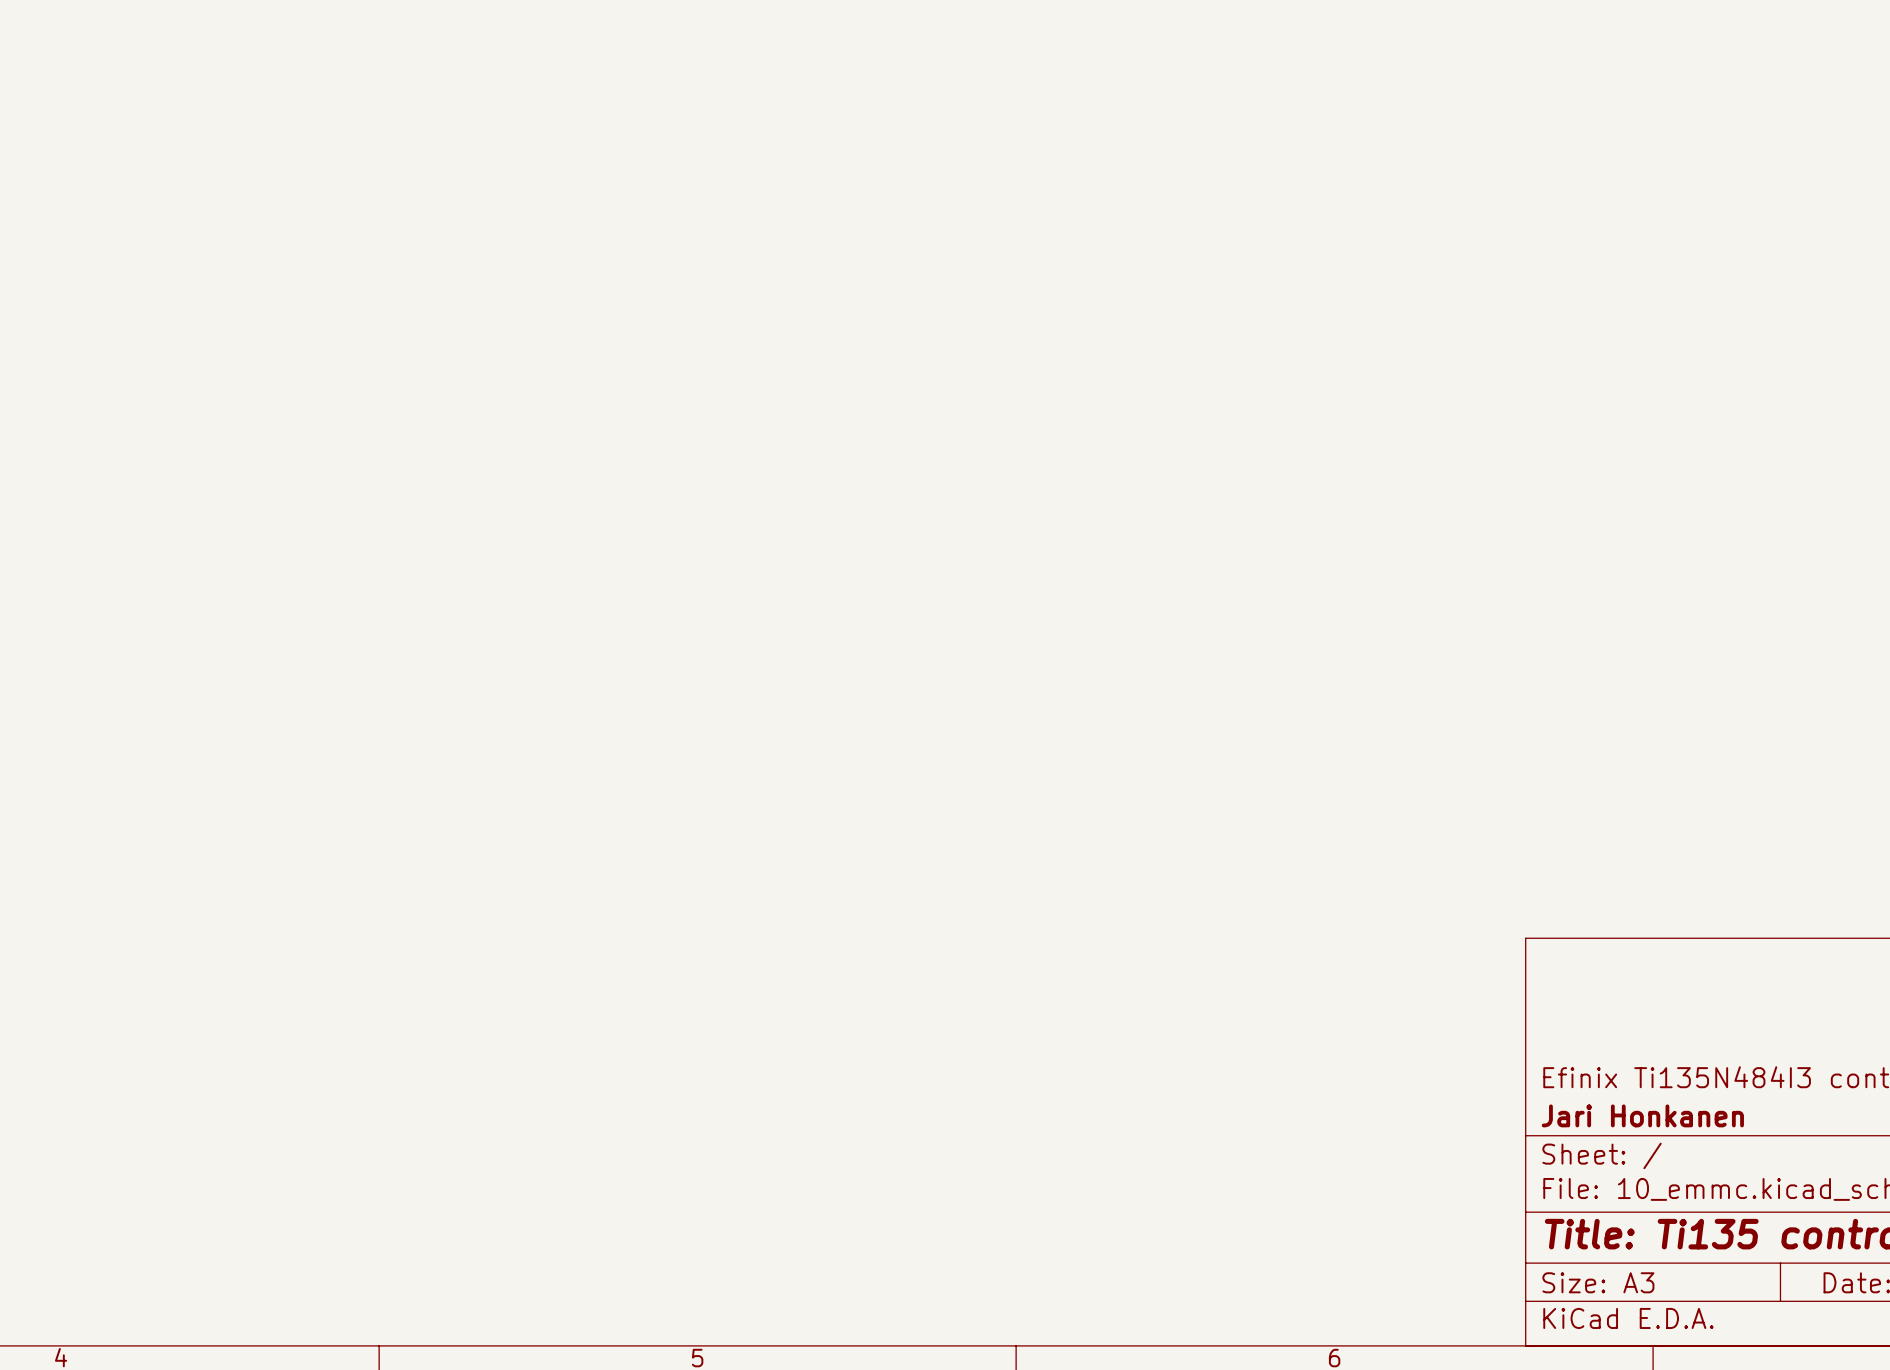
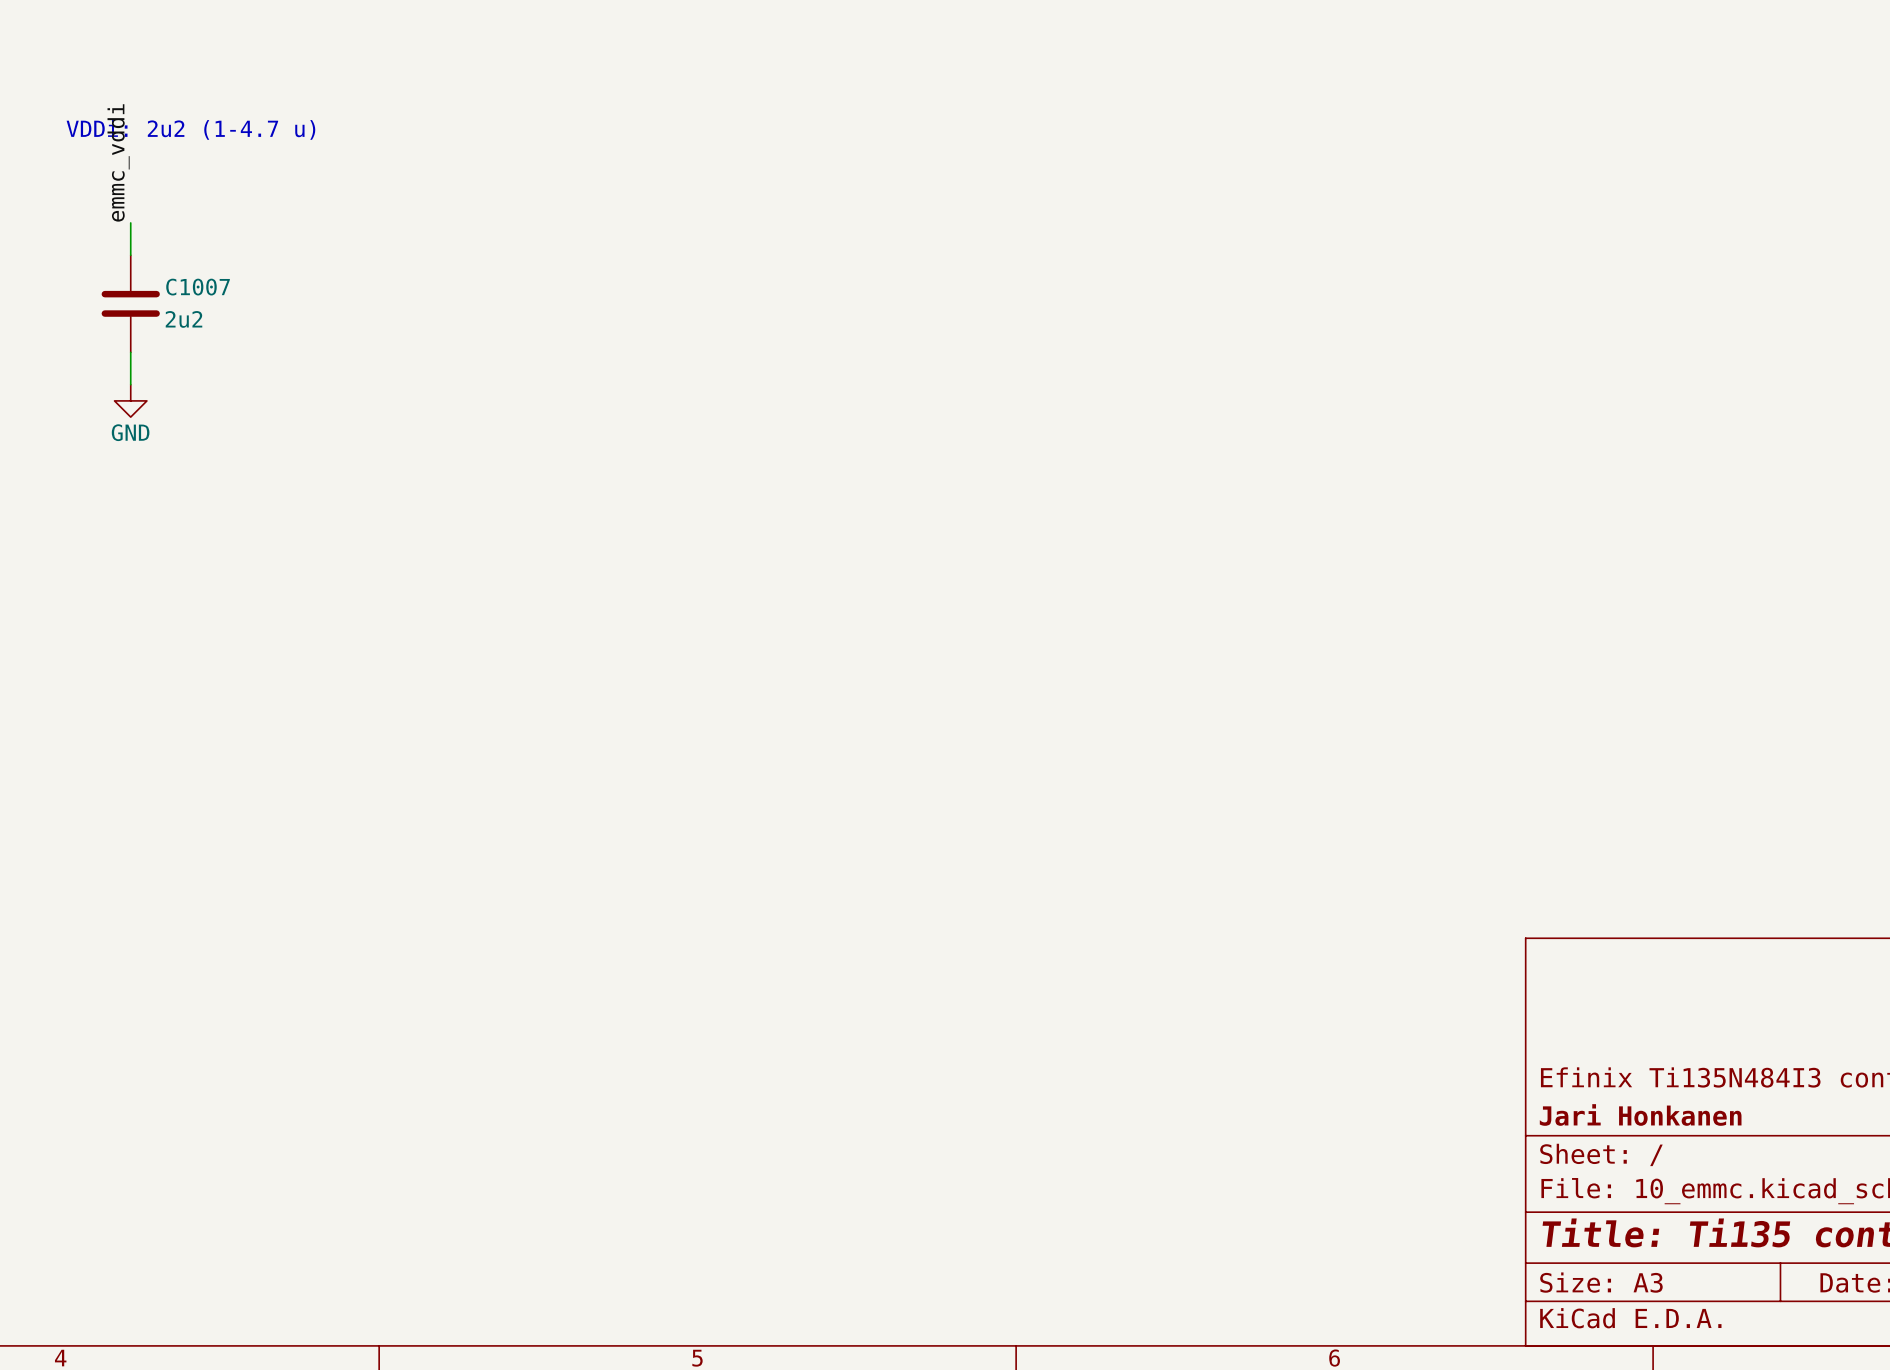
text: none -> VDDi: 2u2 (1-4.7 u) (190, 129)
label: none -> emmc_vddi (118, 162)
wire: none -> (130, 222) (130, 255)
C1007: none -> 2u2 (130, 303)
wire: none -> (130, 352) (130, 384)
power symbol: none -> GND (130, 400)

